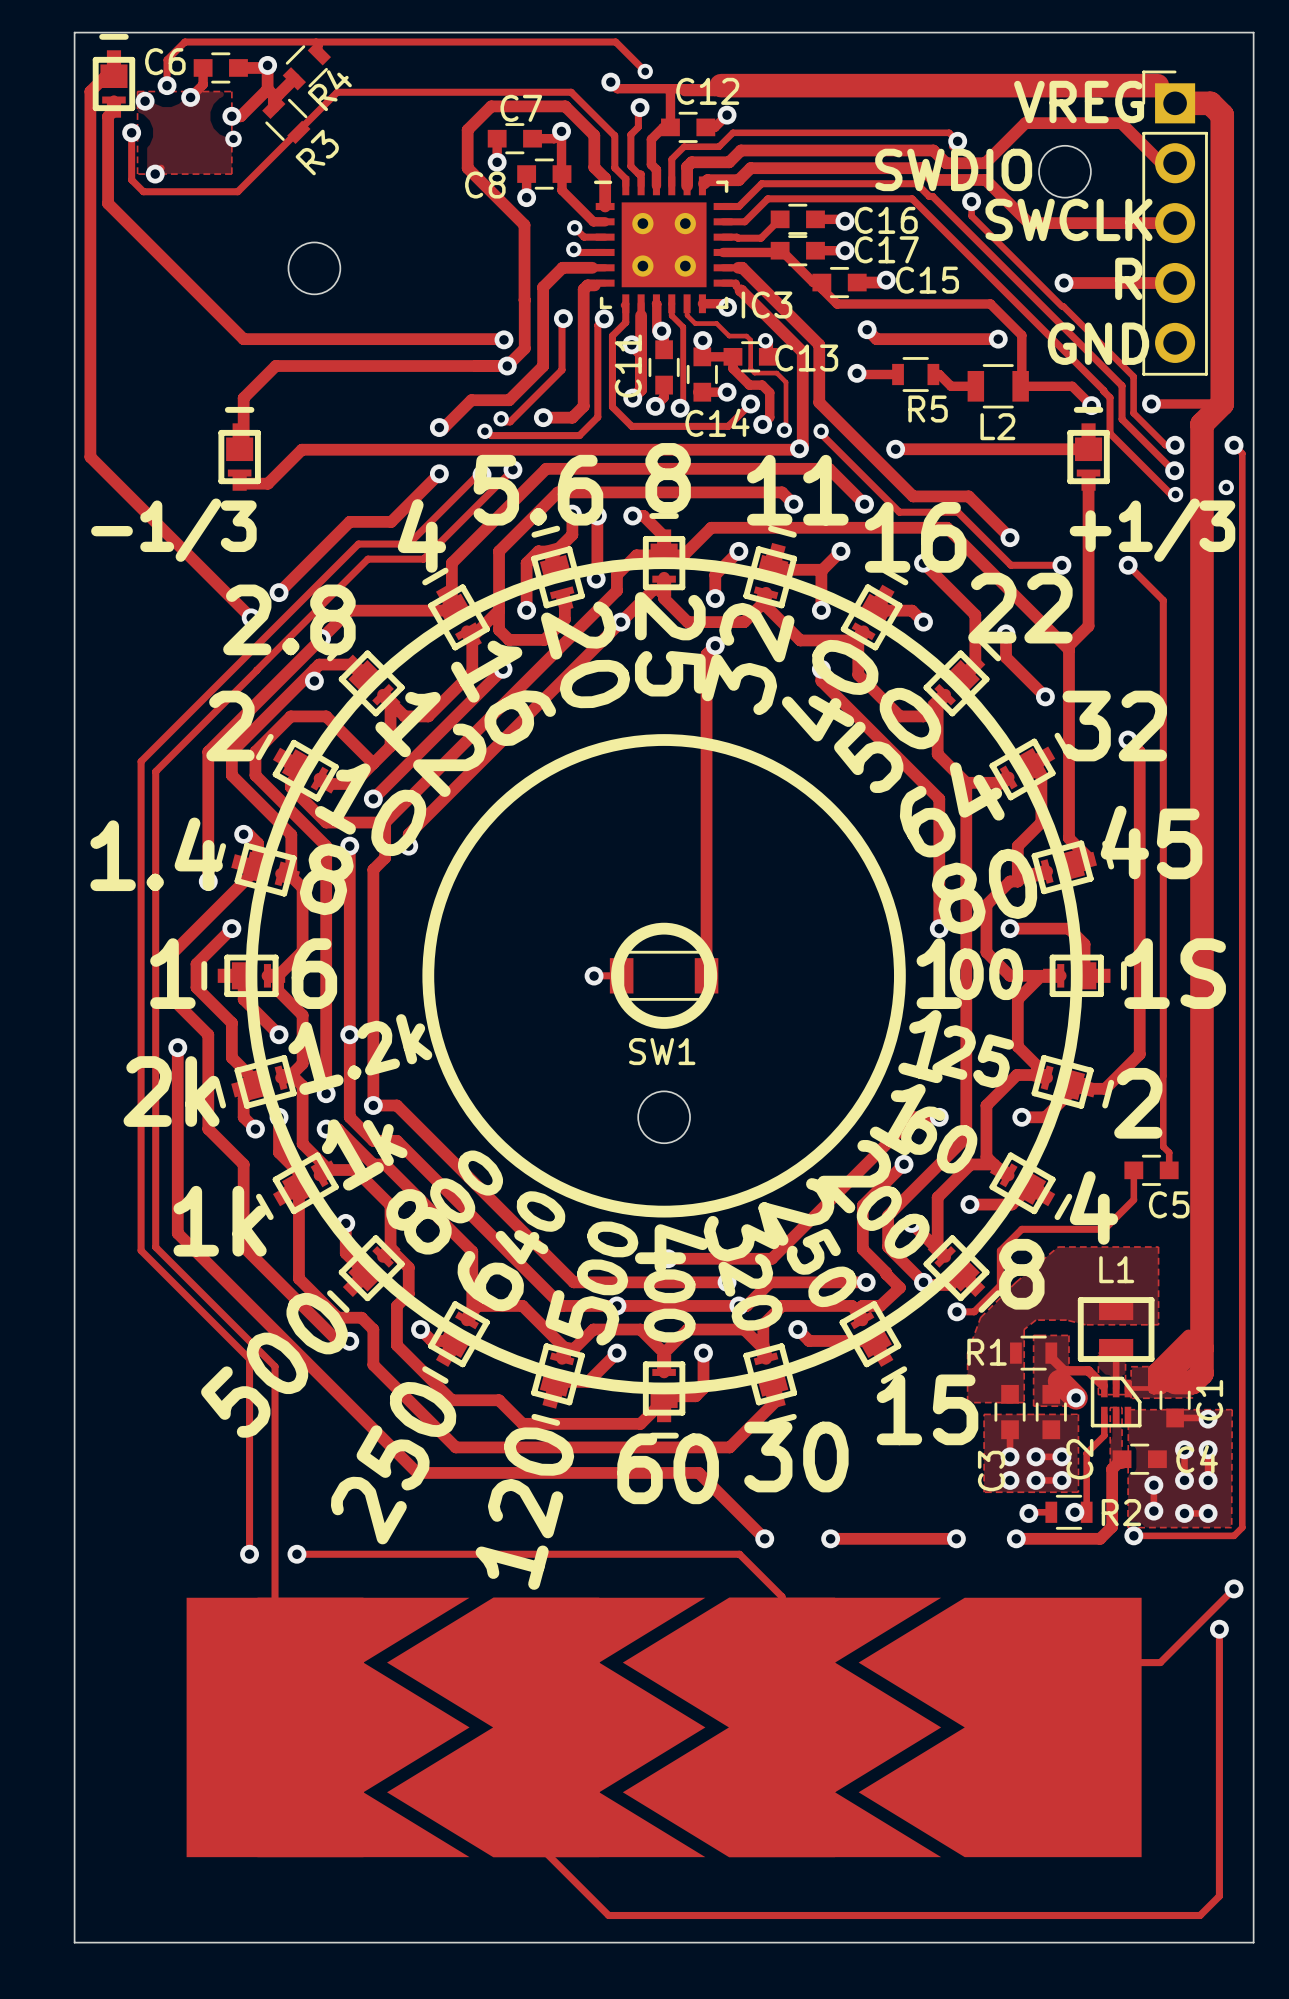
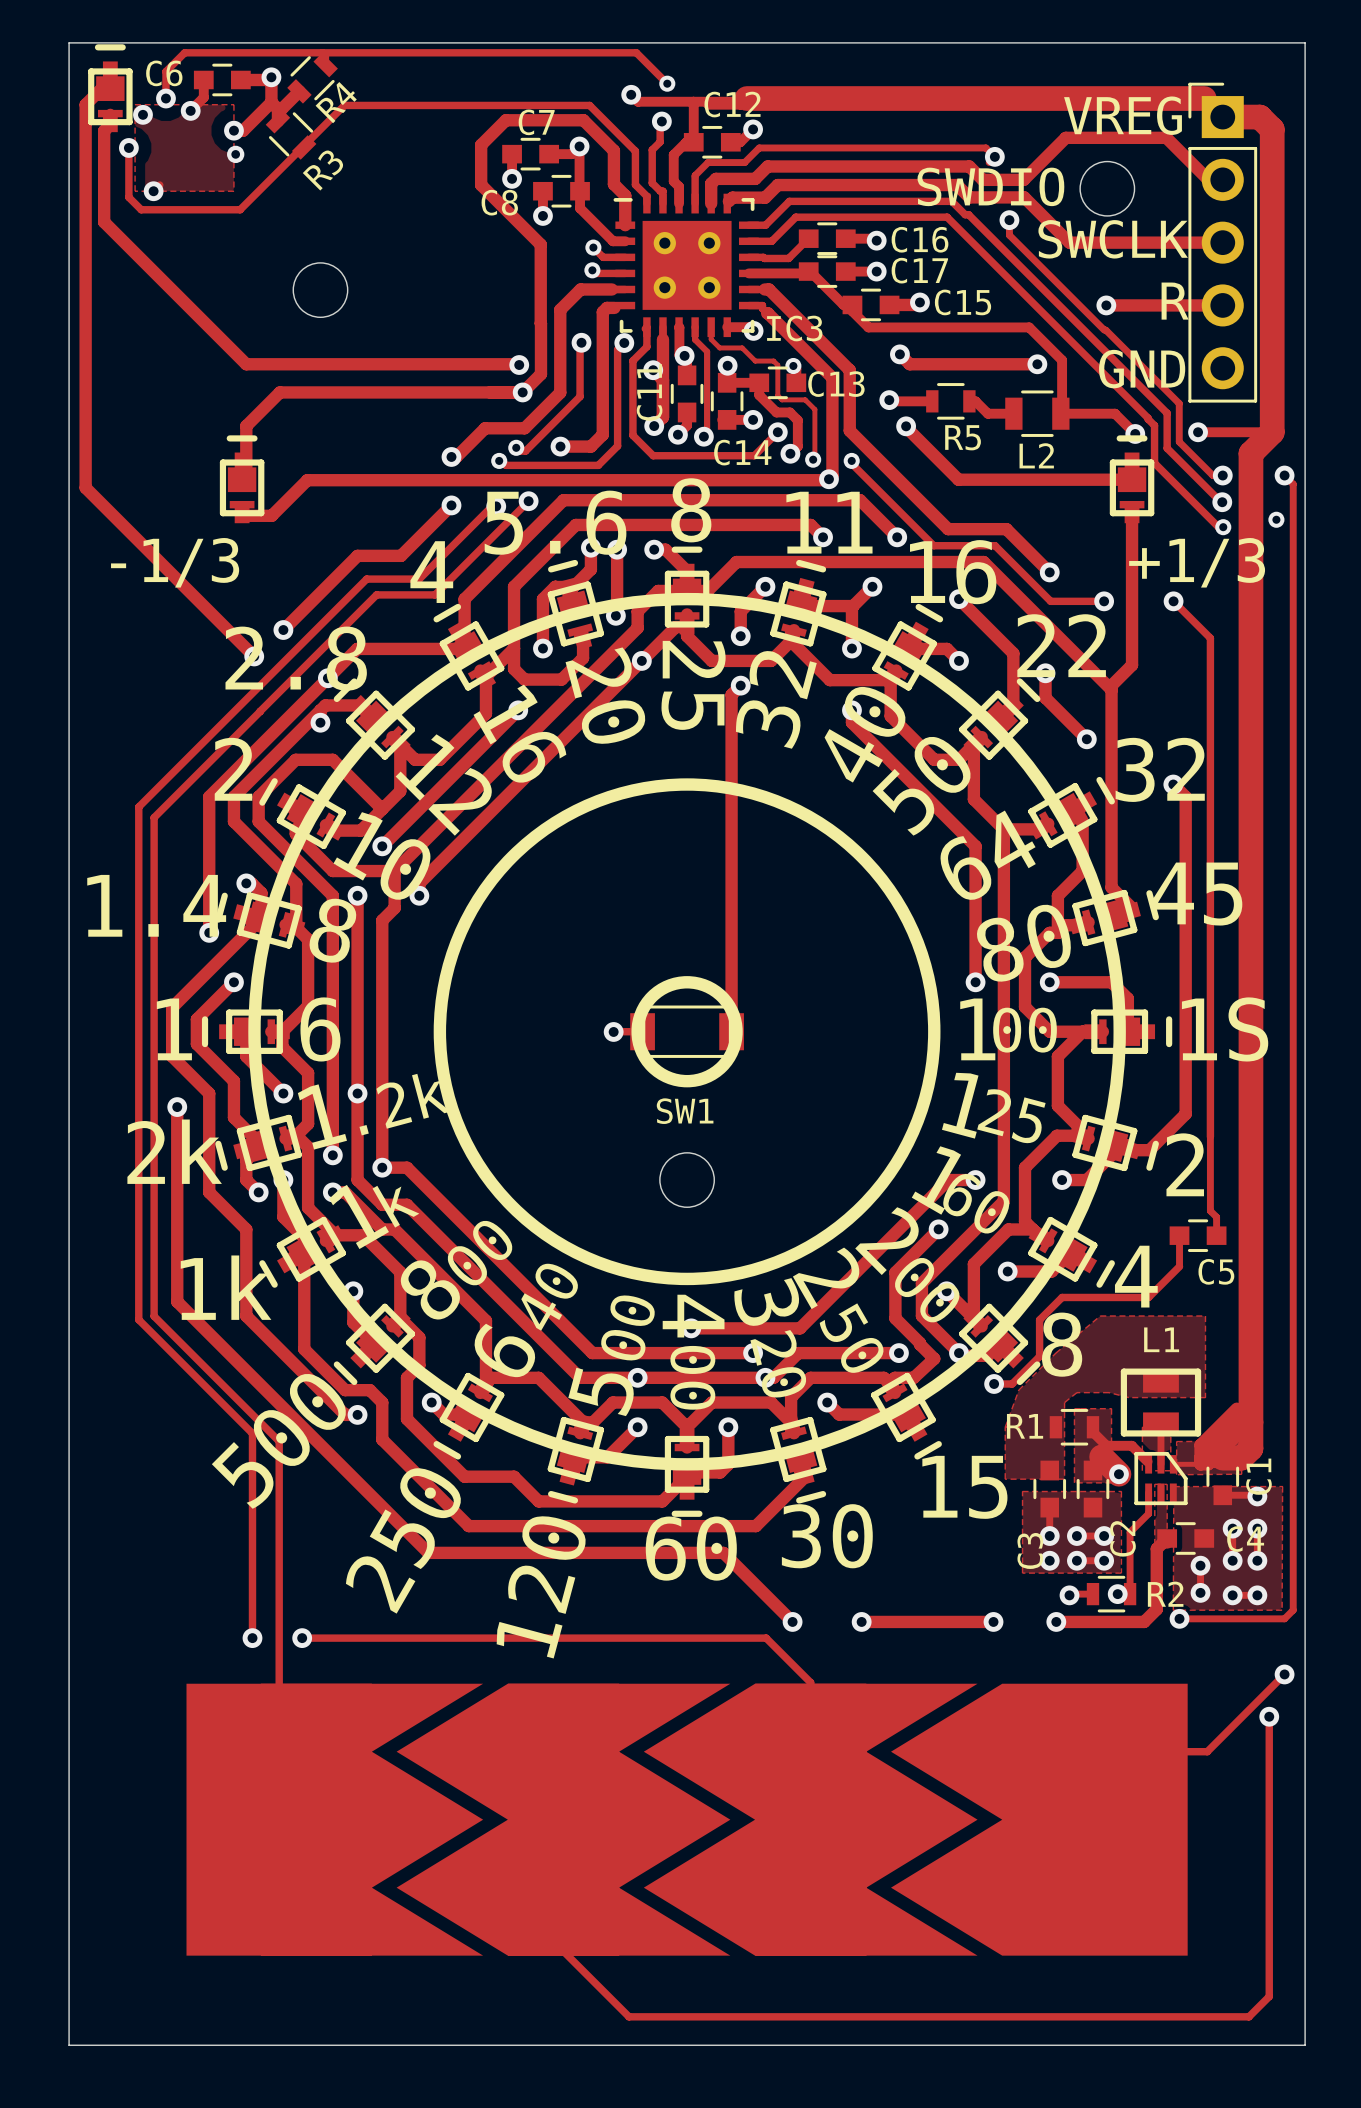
track: (895, 449) (923, 449) -> (906, 426) (958, 479)
via position: (895, 449) -> (906, 426)

